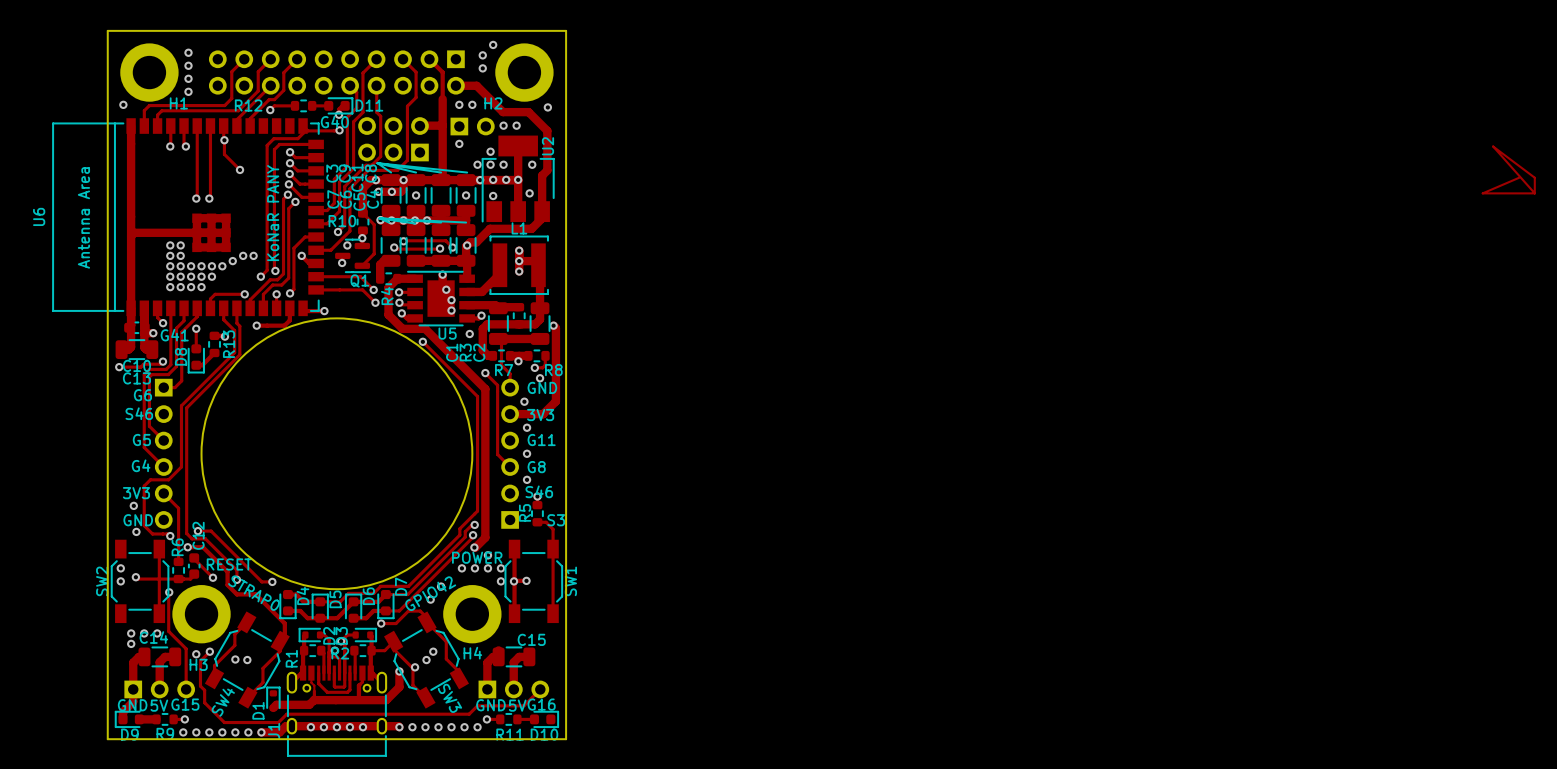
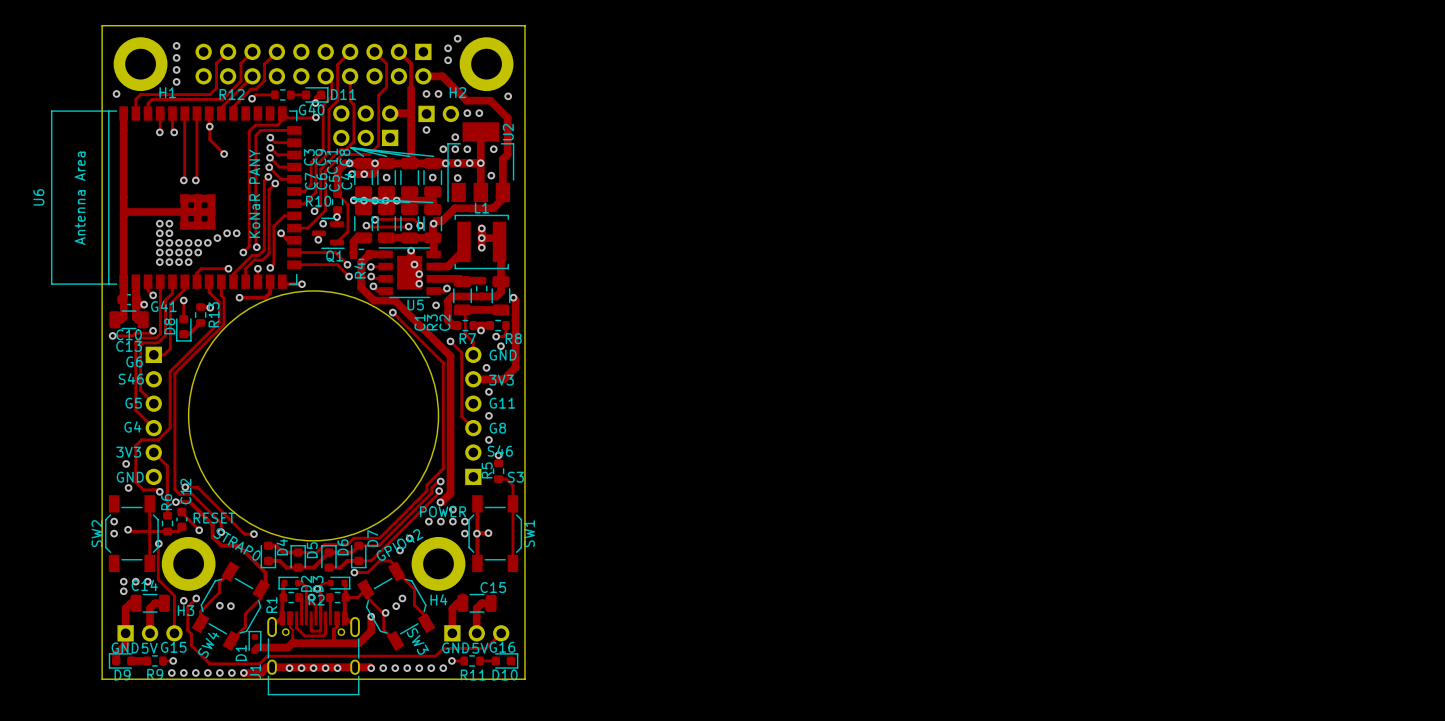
track: (1519, 177) (1482, 193) (1534, 193) -> none
track: (1534, 193) (1534, 177) (1493, 146) (1534, 193) -> none

